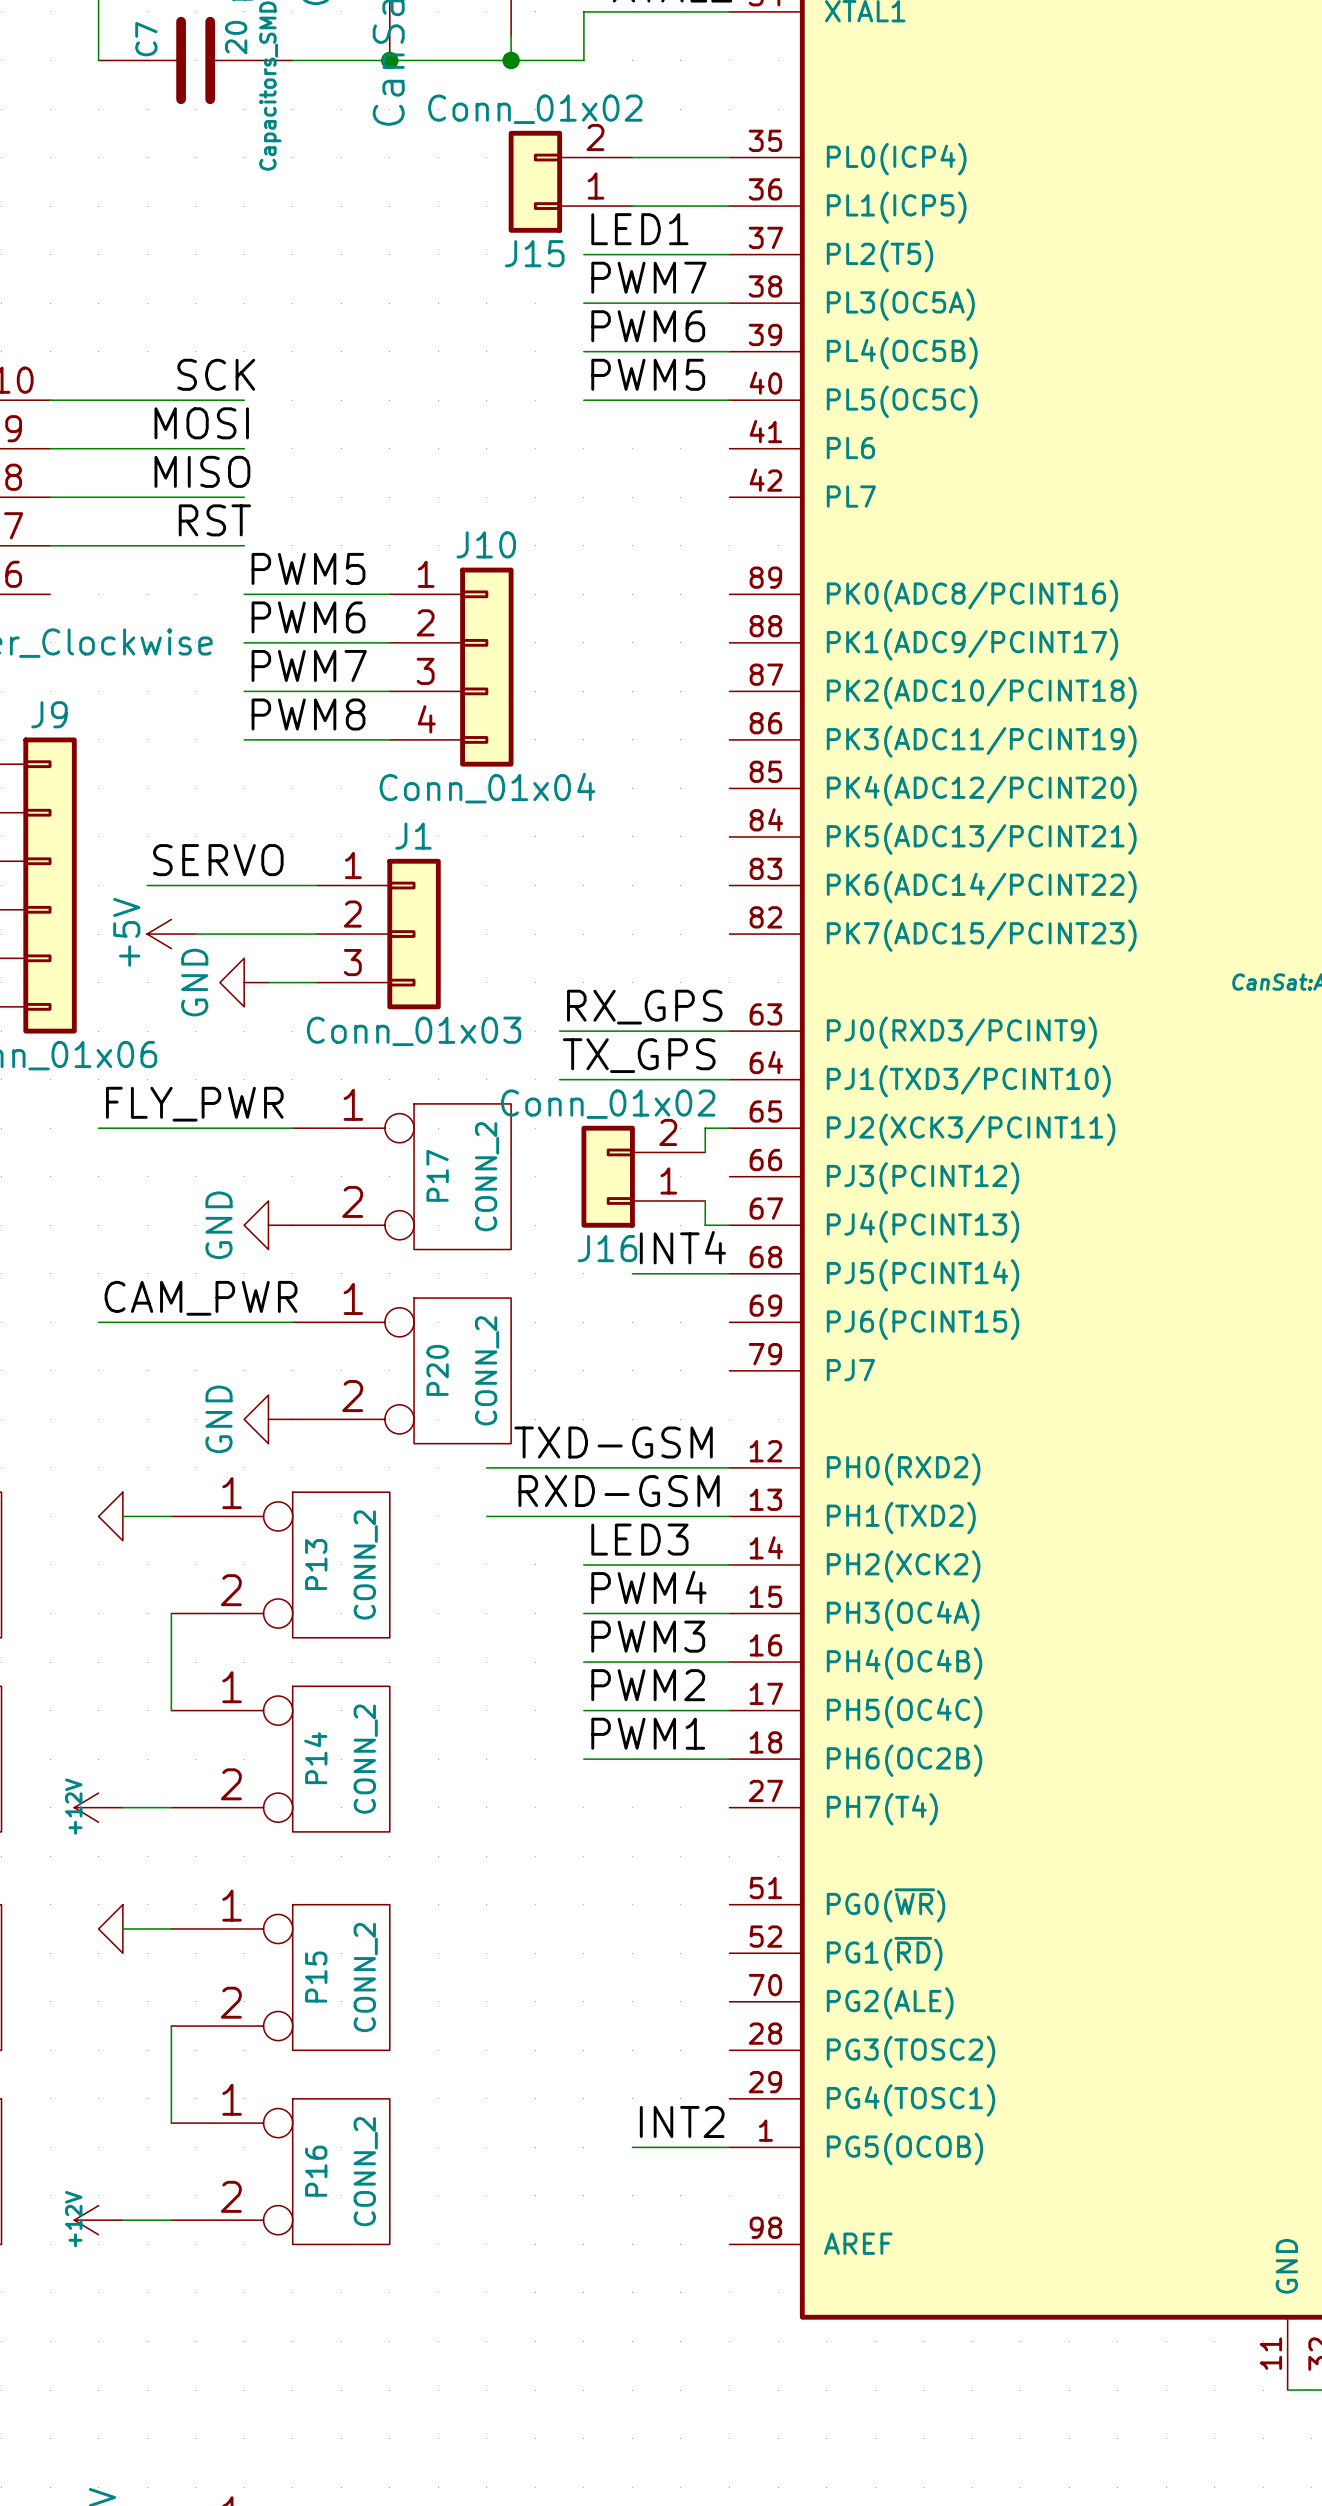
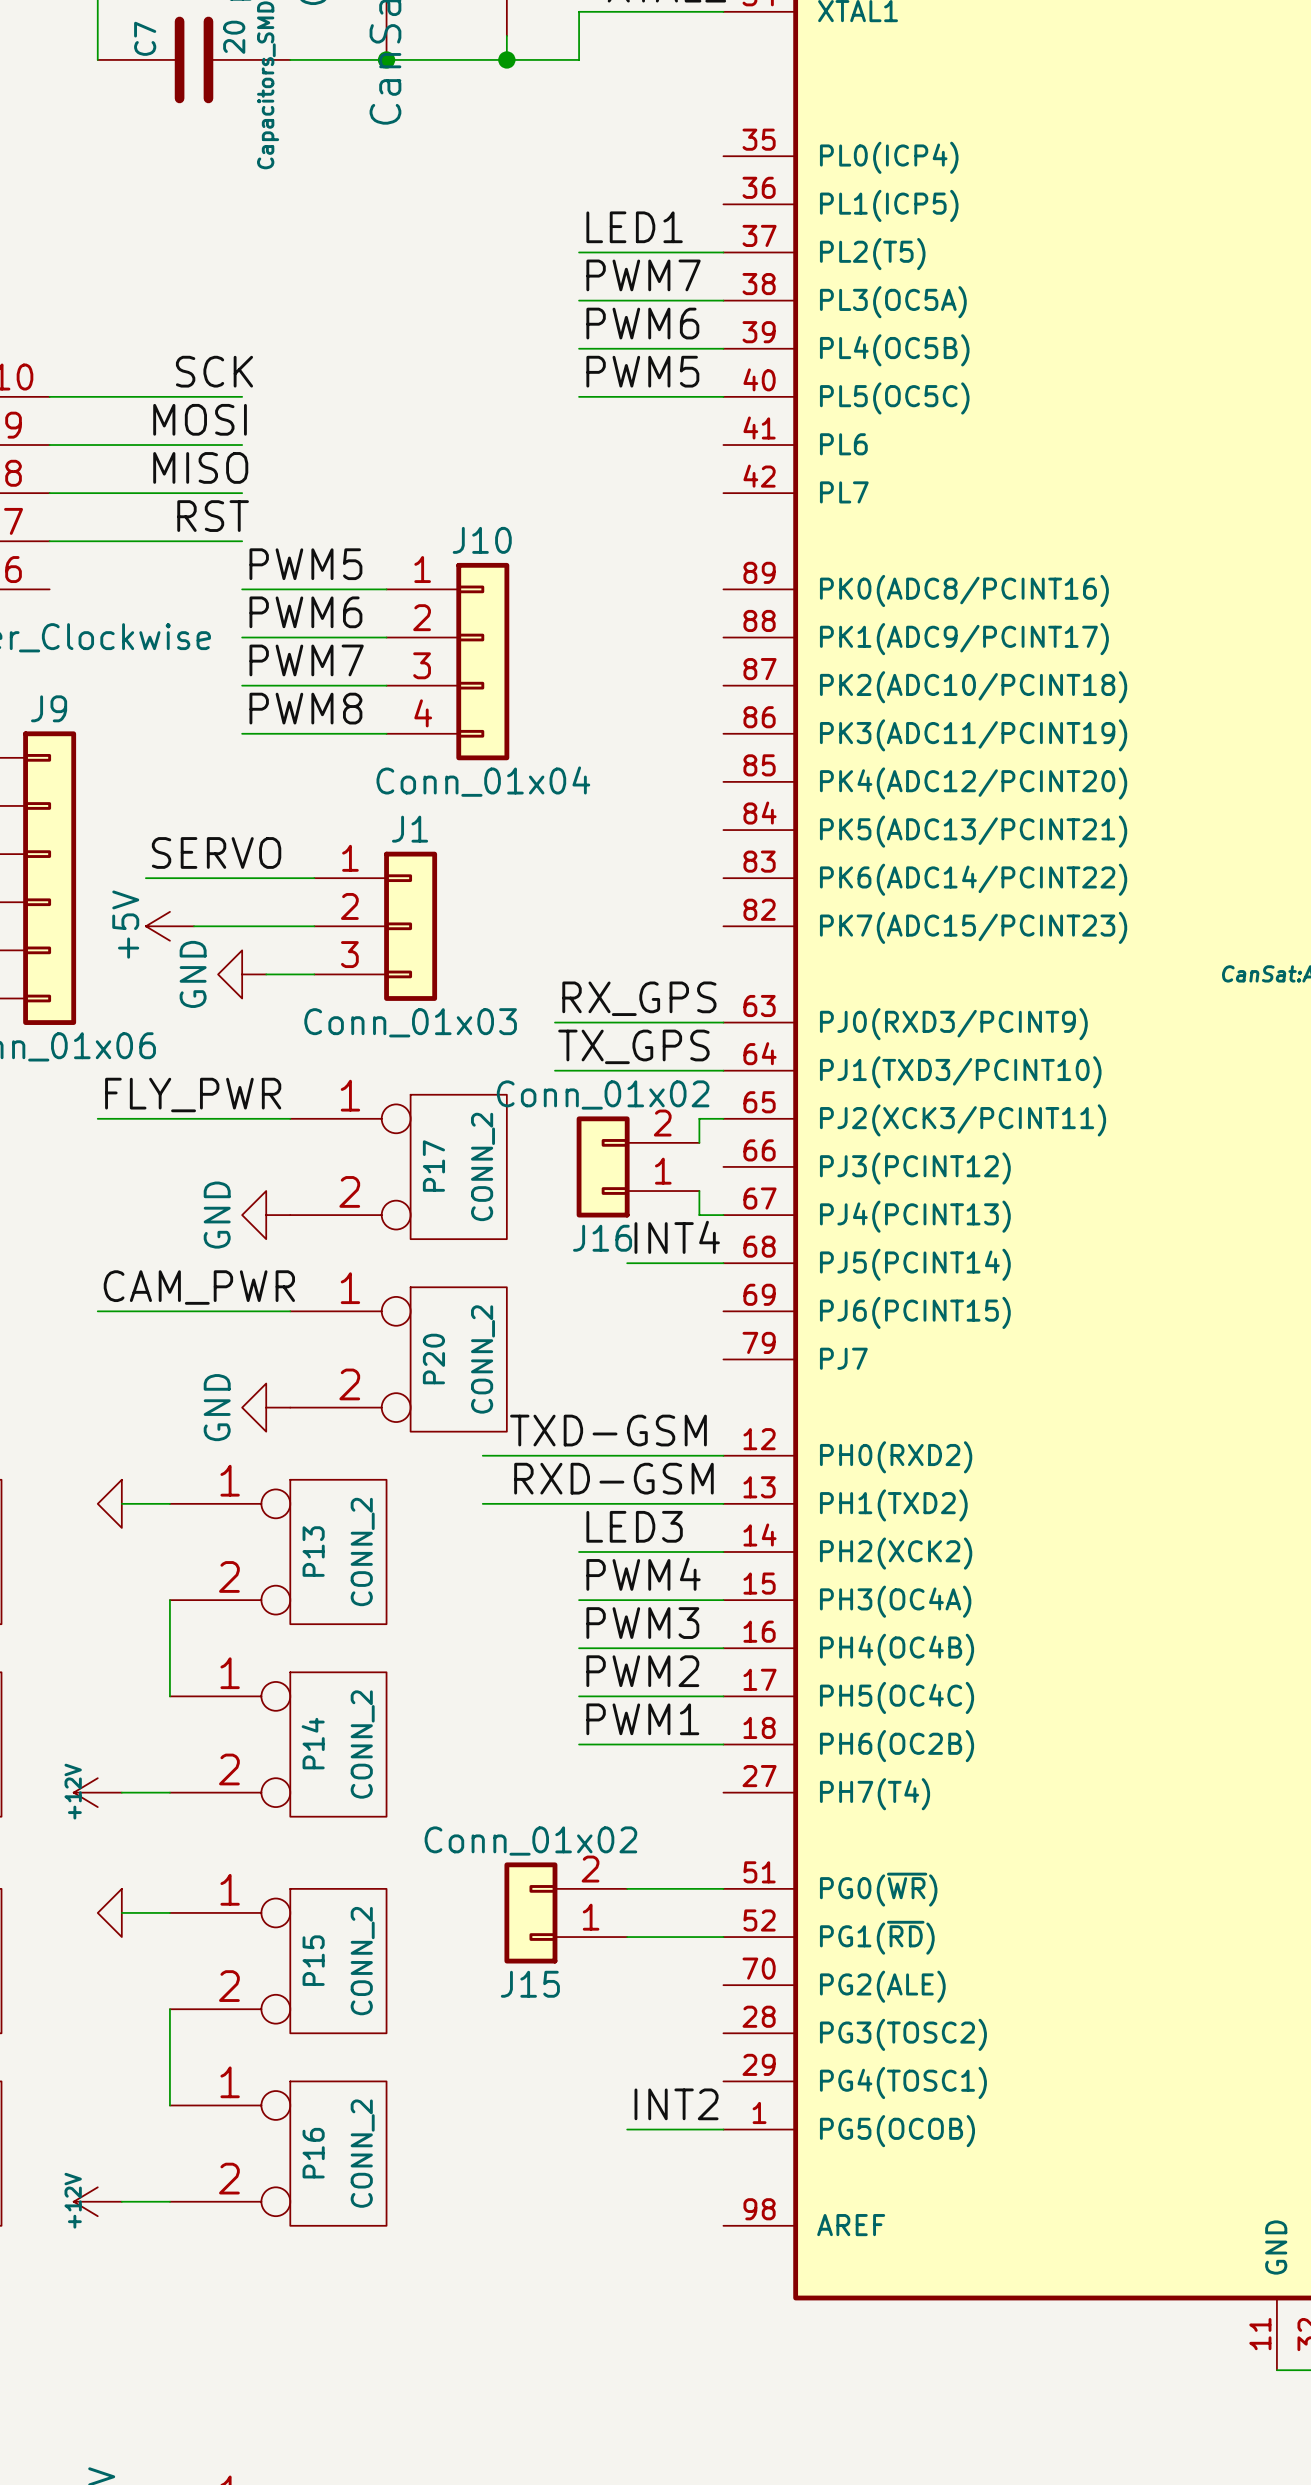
wire: (632, 157) (729, 157) -> none
J15 position: (570, 181) -> (565, 1912)
wire: (632, 206) (729, 206) -> none
wire: none -> (627, 1888) (723, 1888)
wire: none -> (627, 1937) (723, 1937)

